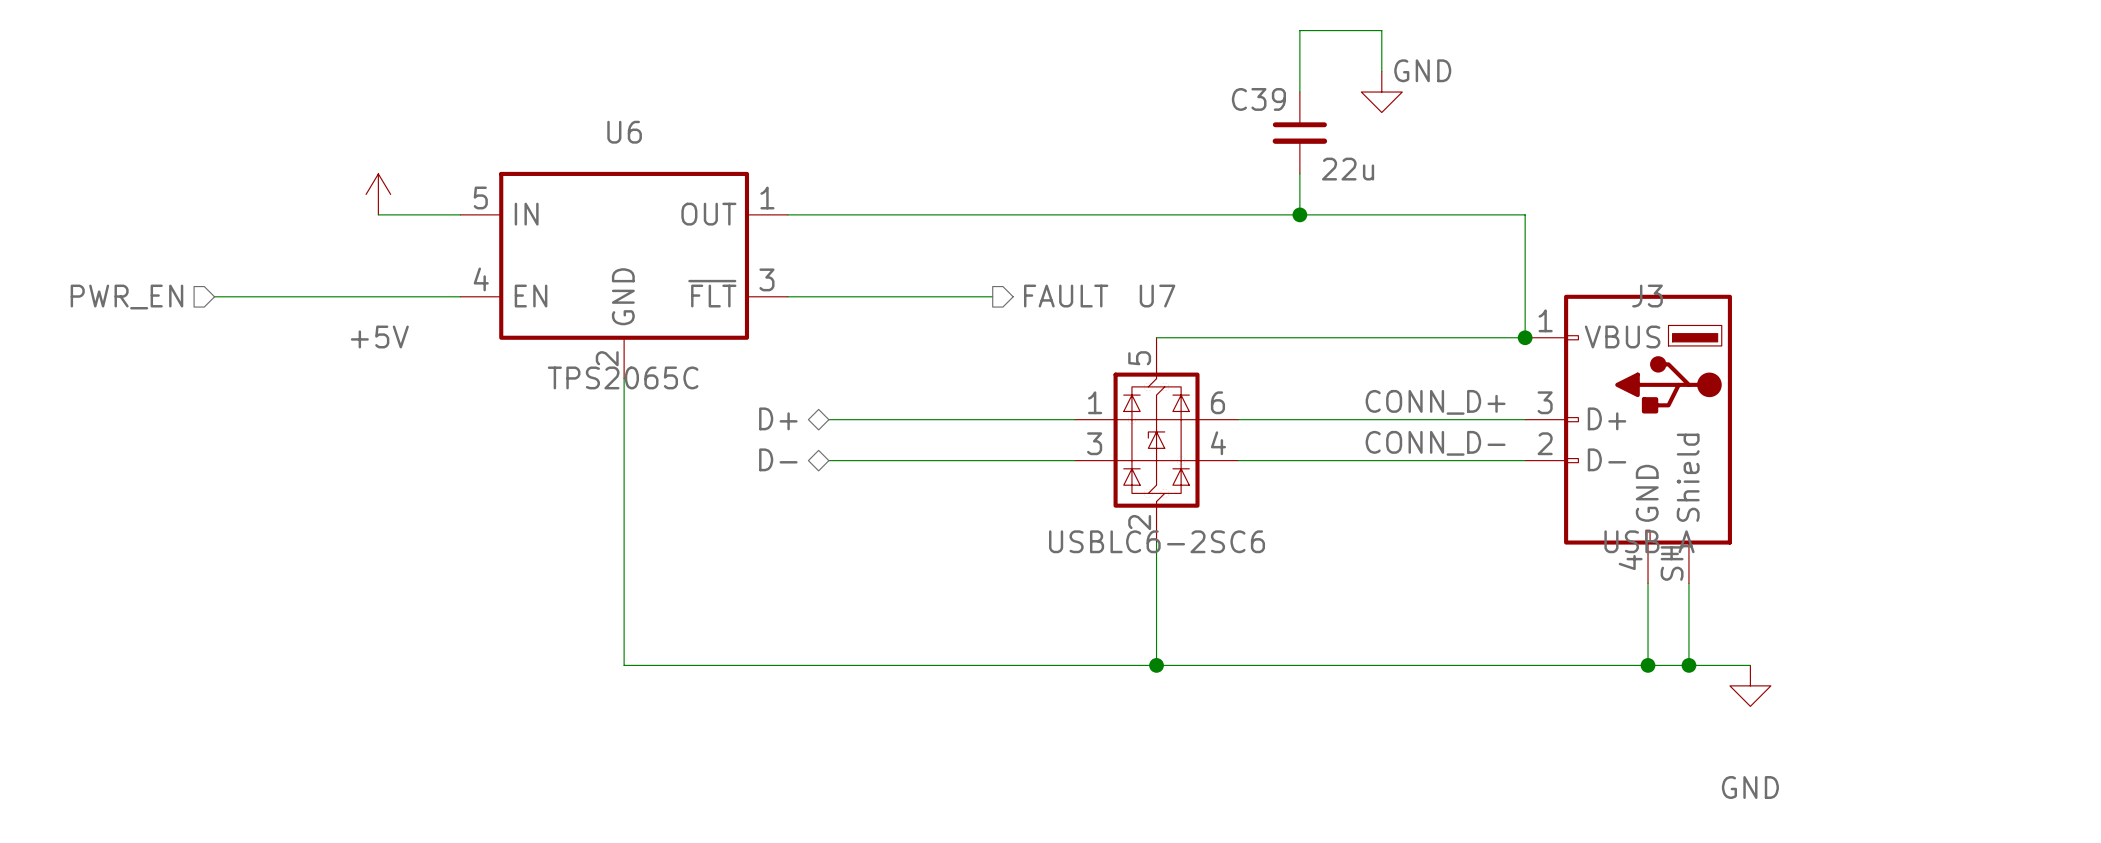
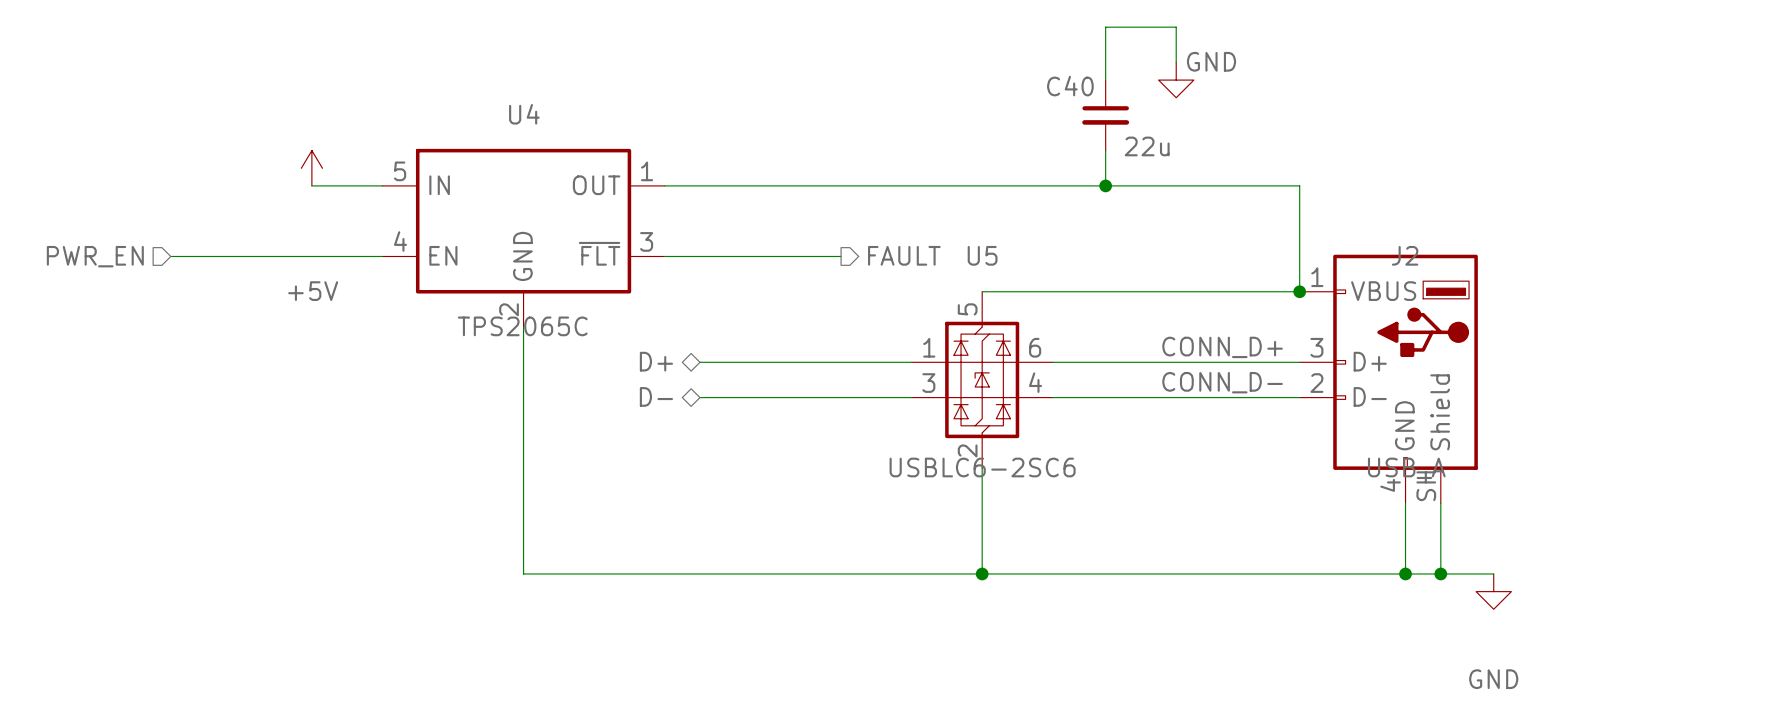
C39 name: C39 (1258, 99) -> C40 (1070, 86)
U6 name: U6 (624, 132) -> U4 (524, 114)
U7 name: U7 (1157, 296) -> U5 (982, 255)
J3 name: J3 (1647, 296) -> J2 (1405, 255)

